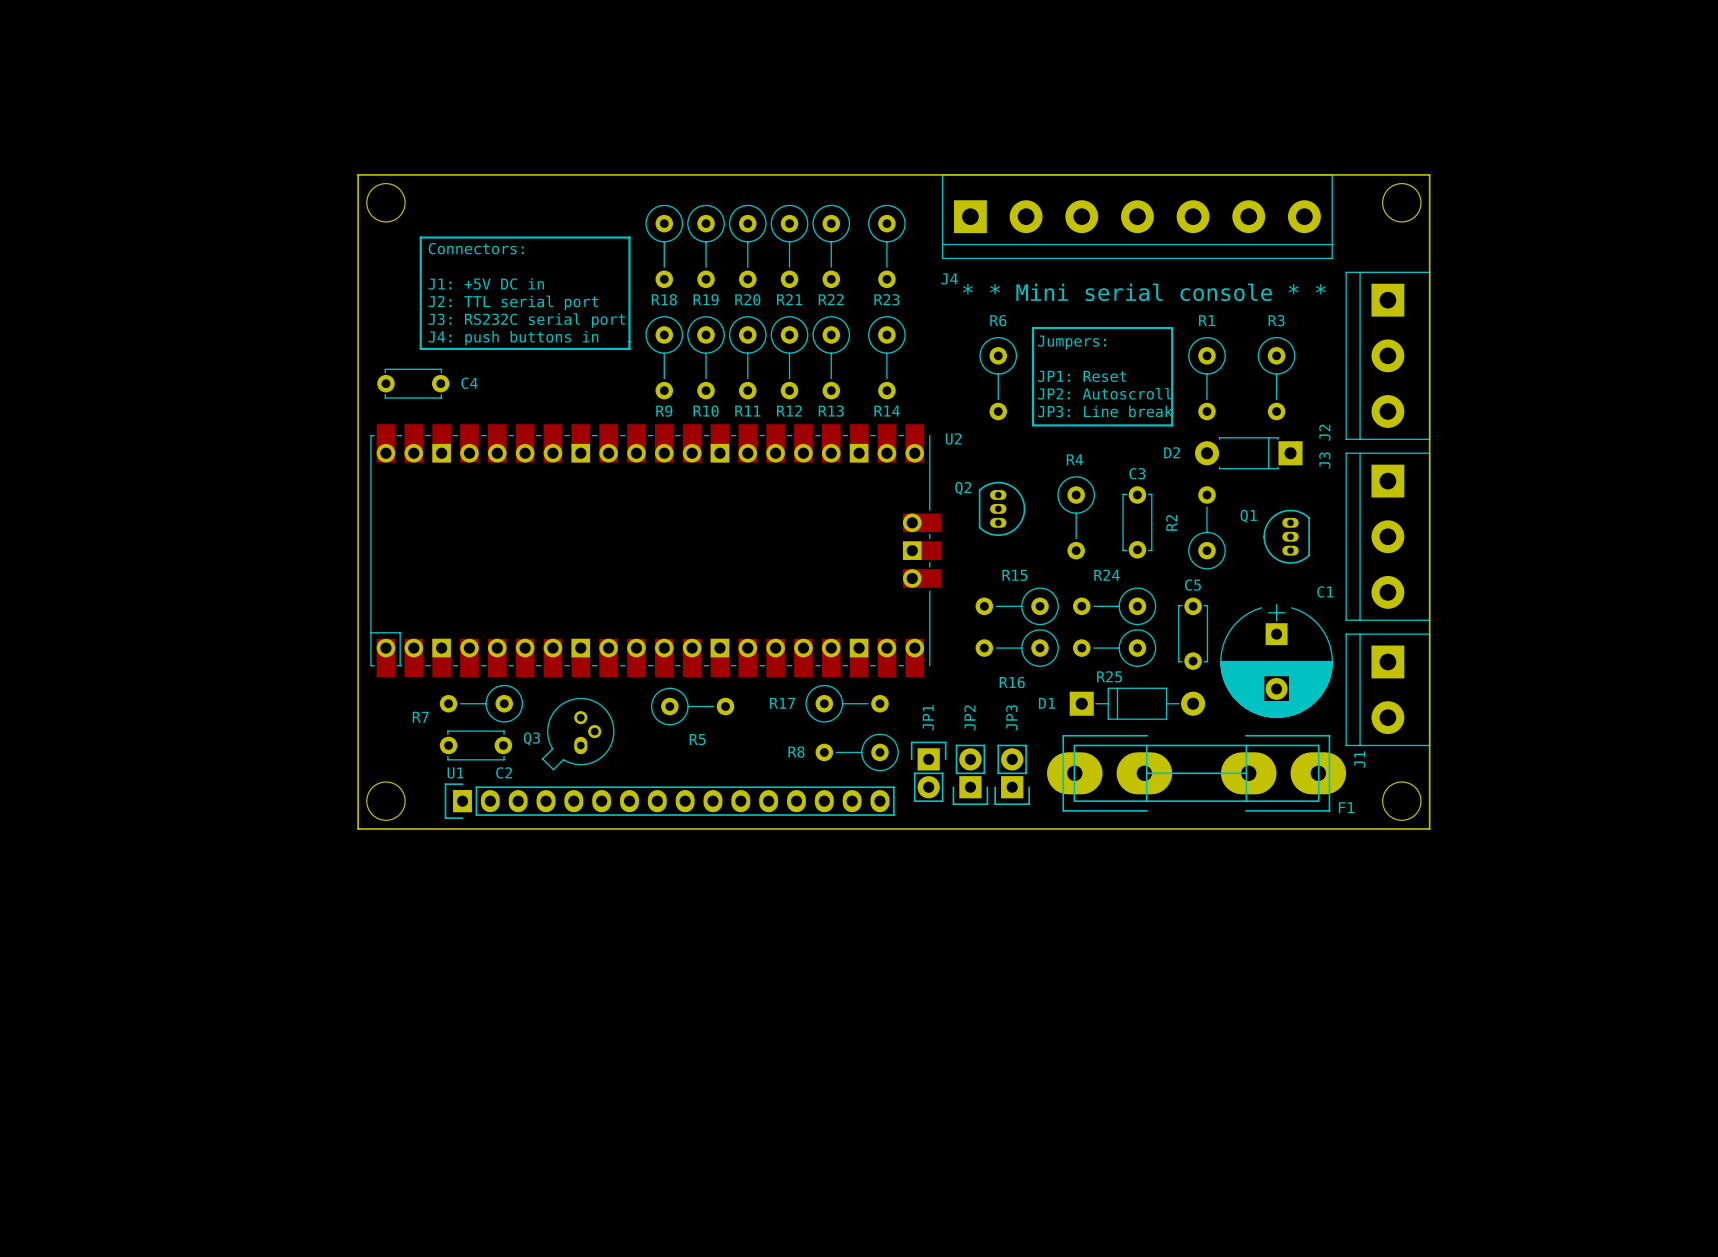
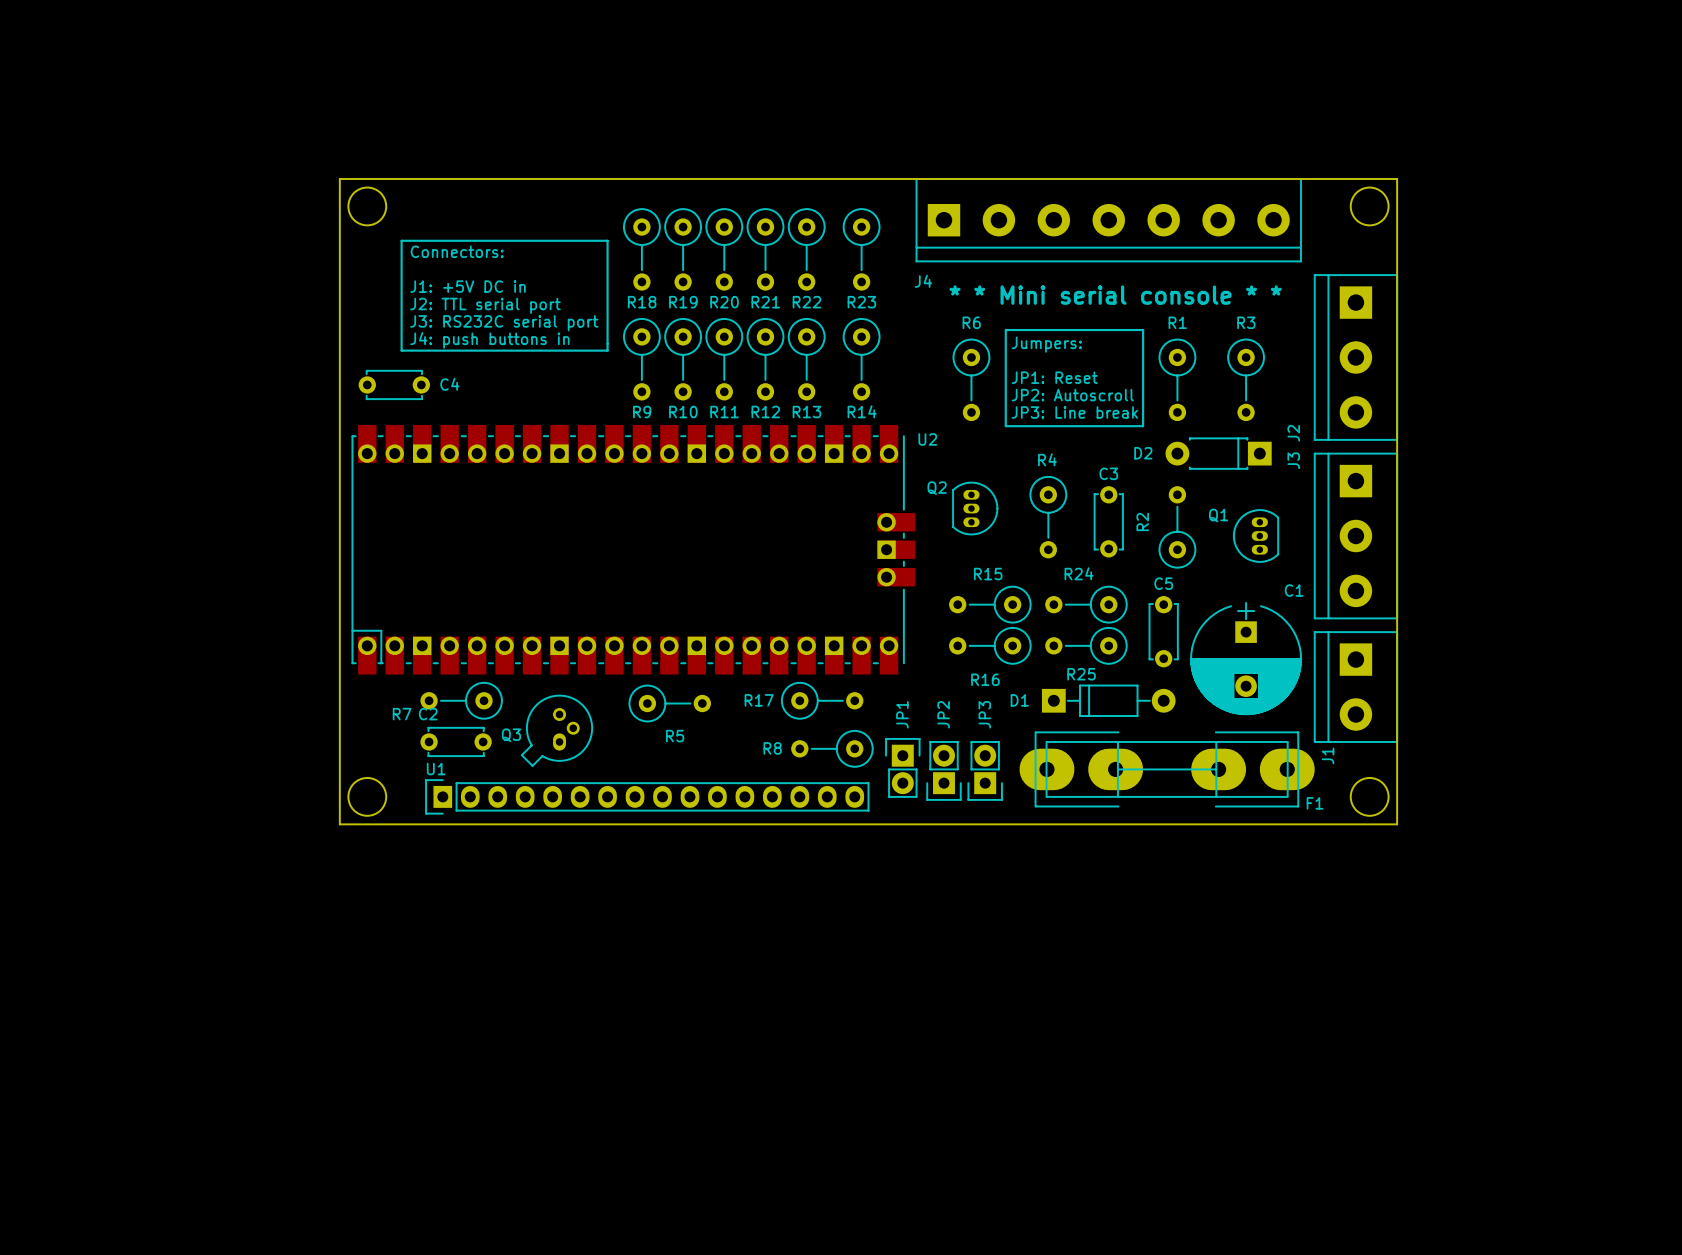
C2 name position: C2 (504, 772) -> C2 (428, 714)

